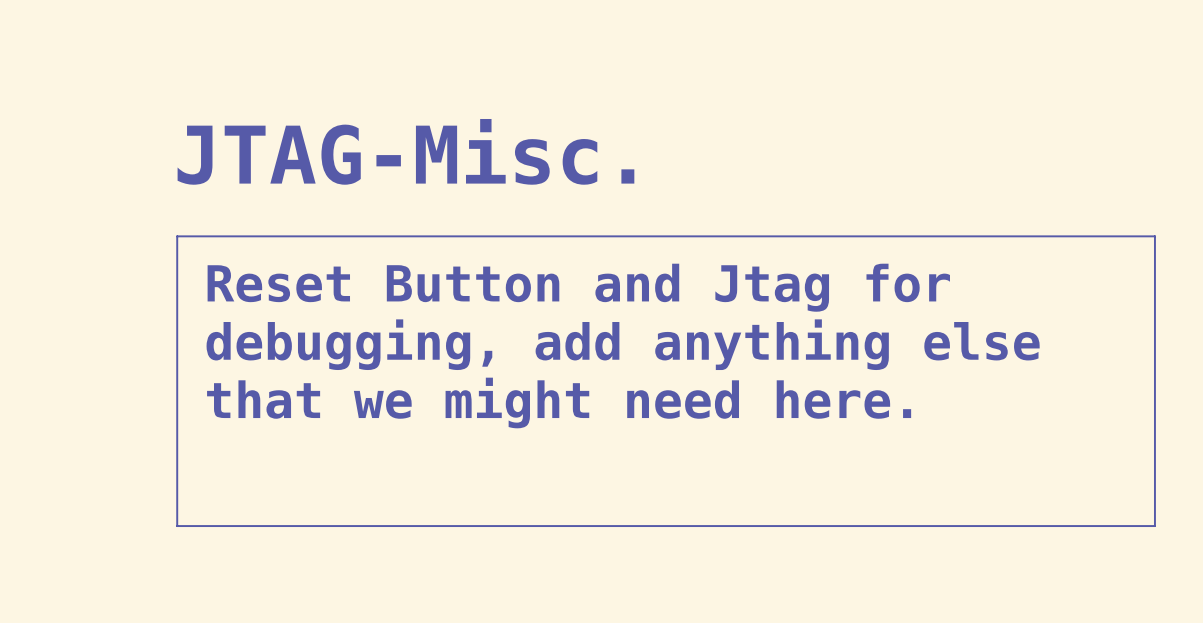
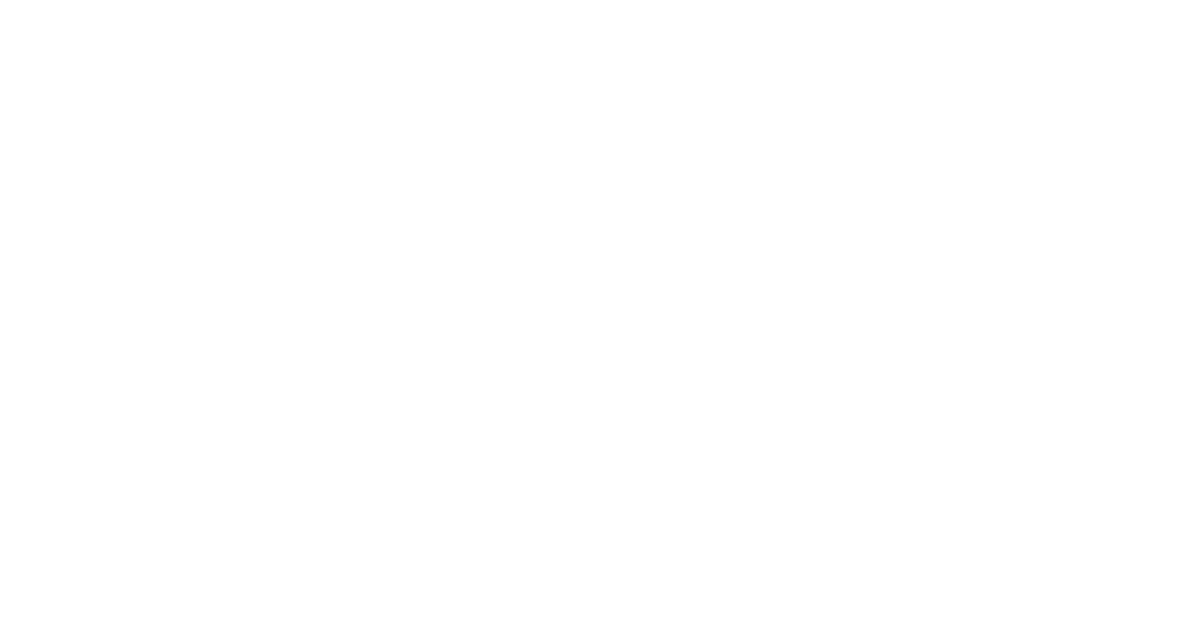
text: JTAG-Misc. (405, 151) -> none
line: (177, 236) (1154, 236) (1154, 526) (177, 526) (177, 236) -> none
text: Reset Button and Jtag for (578, 287) -> none
text: debugging, add anything else (623, 344) -> none
text: that we might need here. (559, 403) -> none

